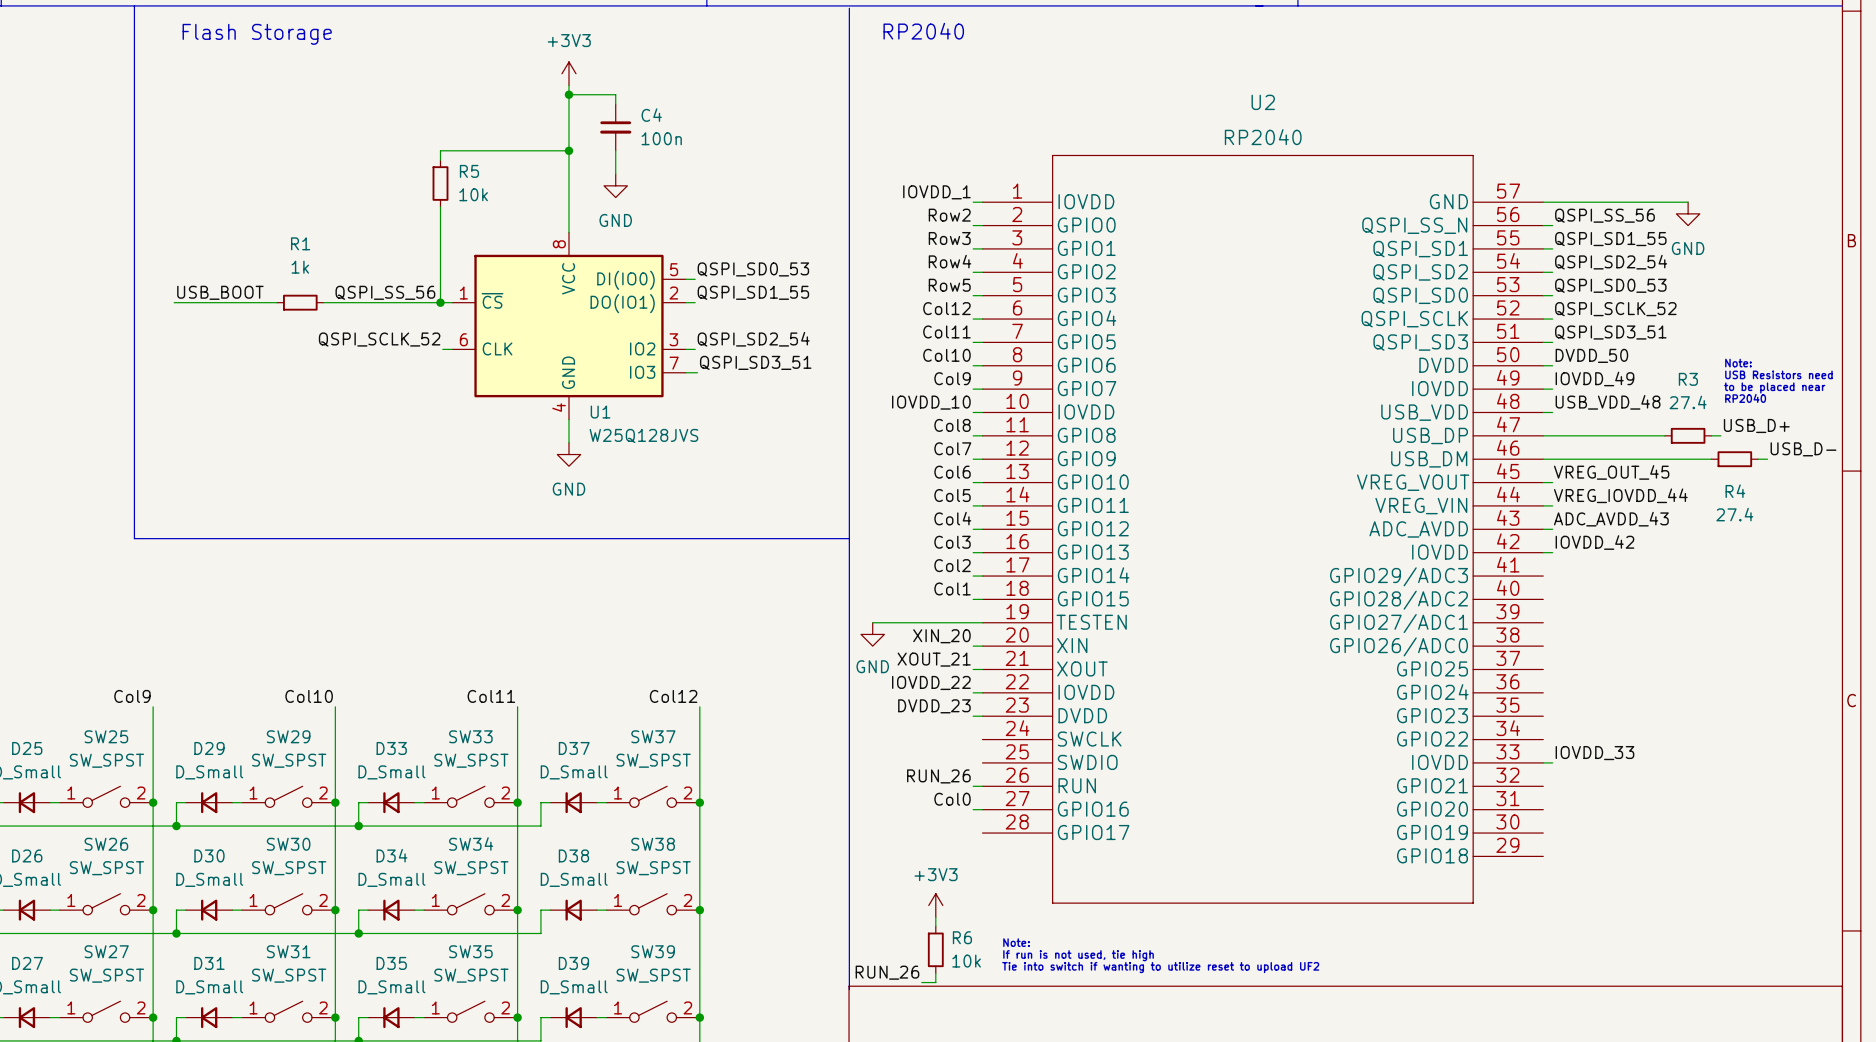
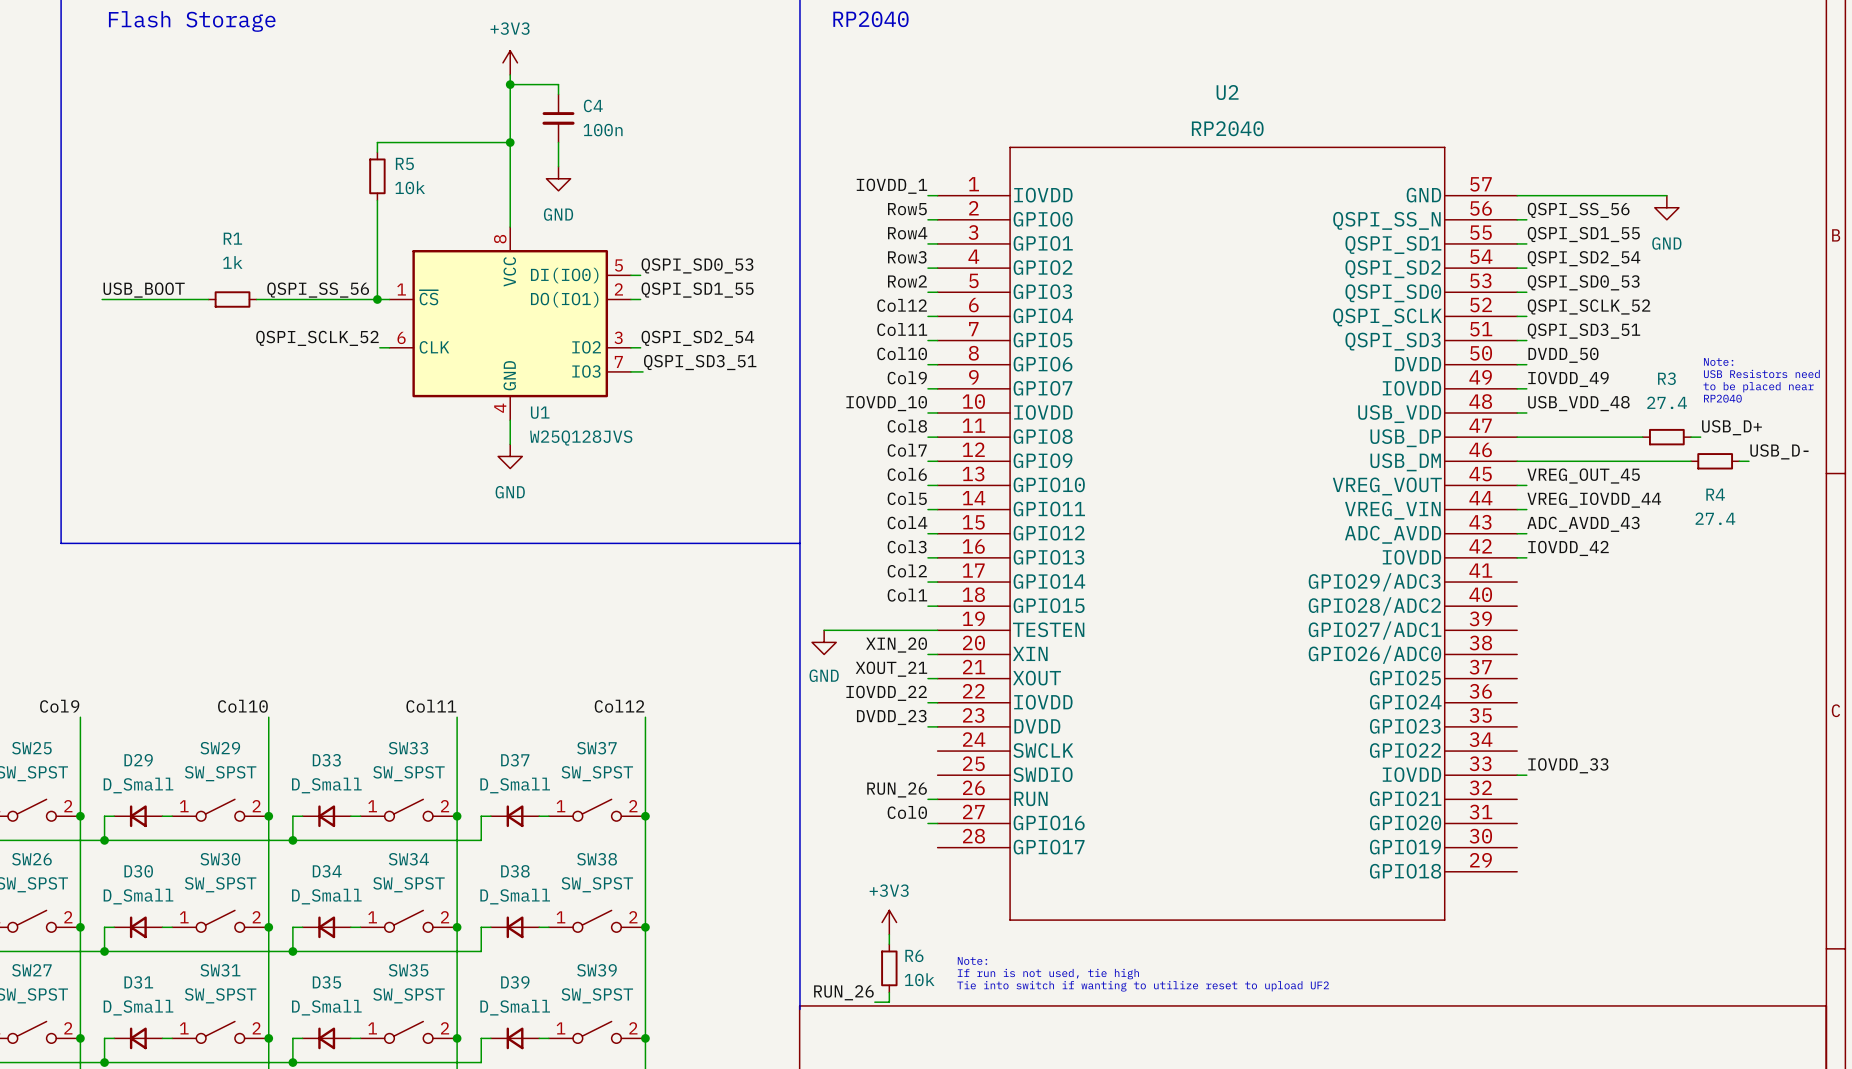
label: Row2 (949, 215) -> Row5 (907, 209)
label: Row3 (949, 238) -> Row4 (907, 233)
label: Row4 (950, 261) -> Row3 (907, 257)
label: Row5 (949, 285) -> Row2 (907, 281)

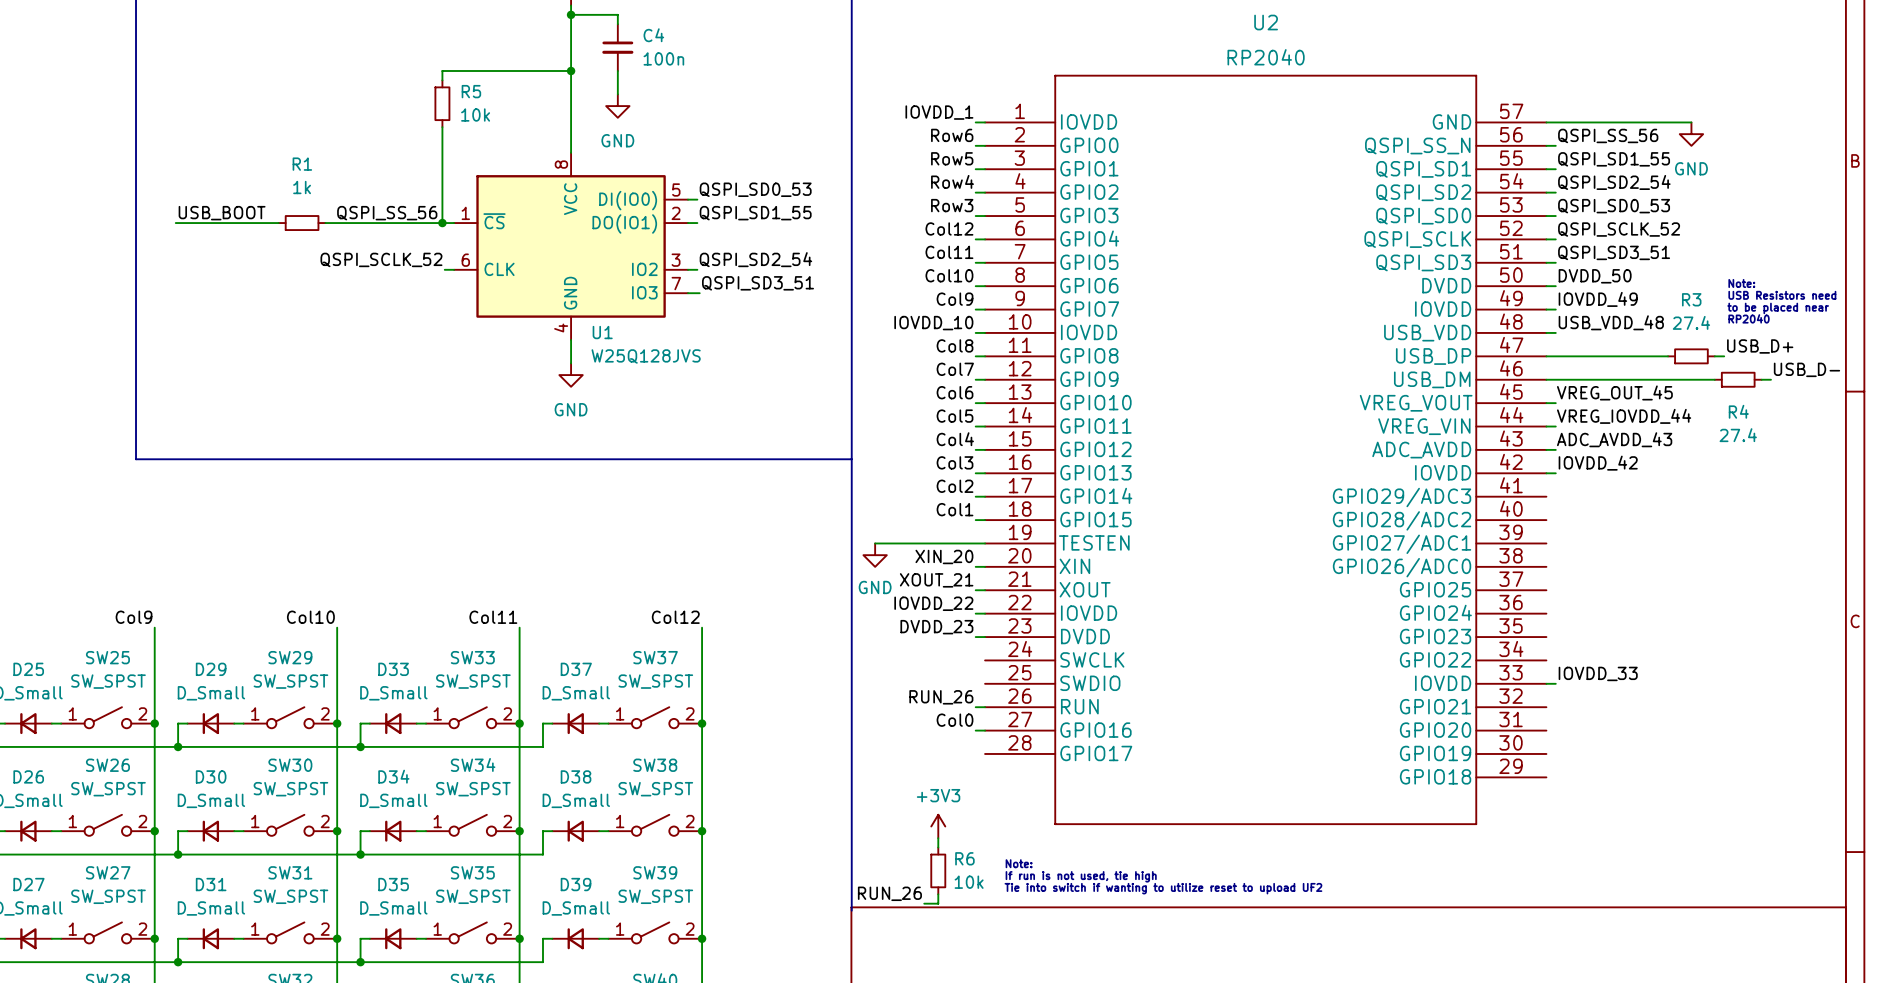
label: Row5 (907, 209) -> Row6 (952, 135)
label: Row4 (907, 233) -> Row5 (952, 158)
label: Row3 (907, 257) -> Row4 (952, 181)
label: Row2 (907, 281) -> Row3 (952, 205)

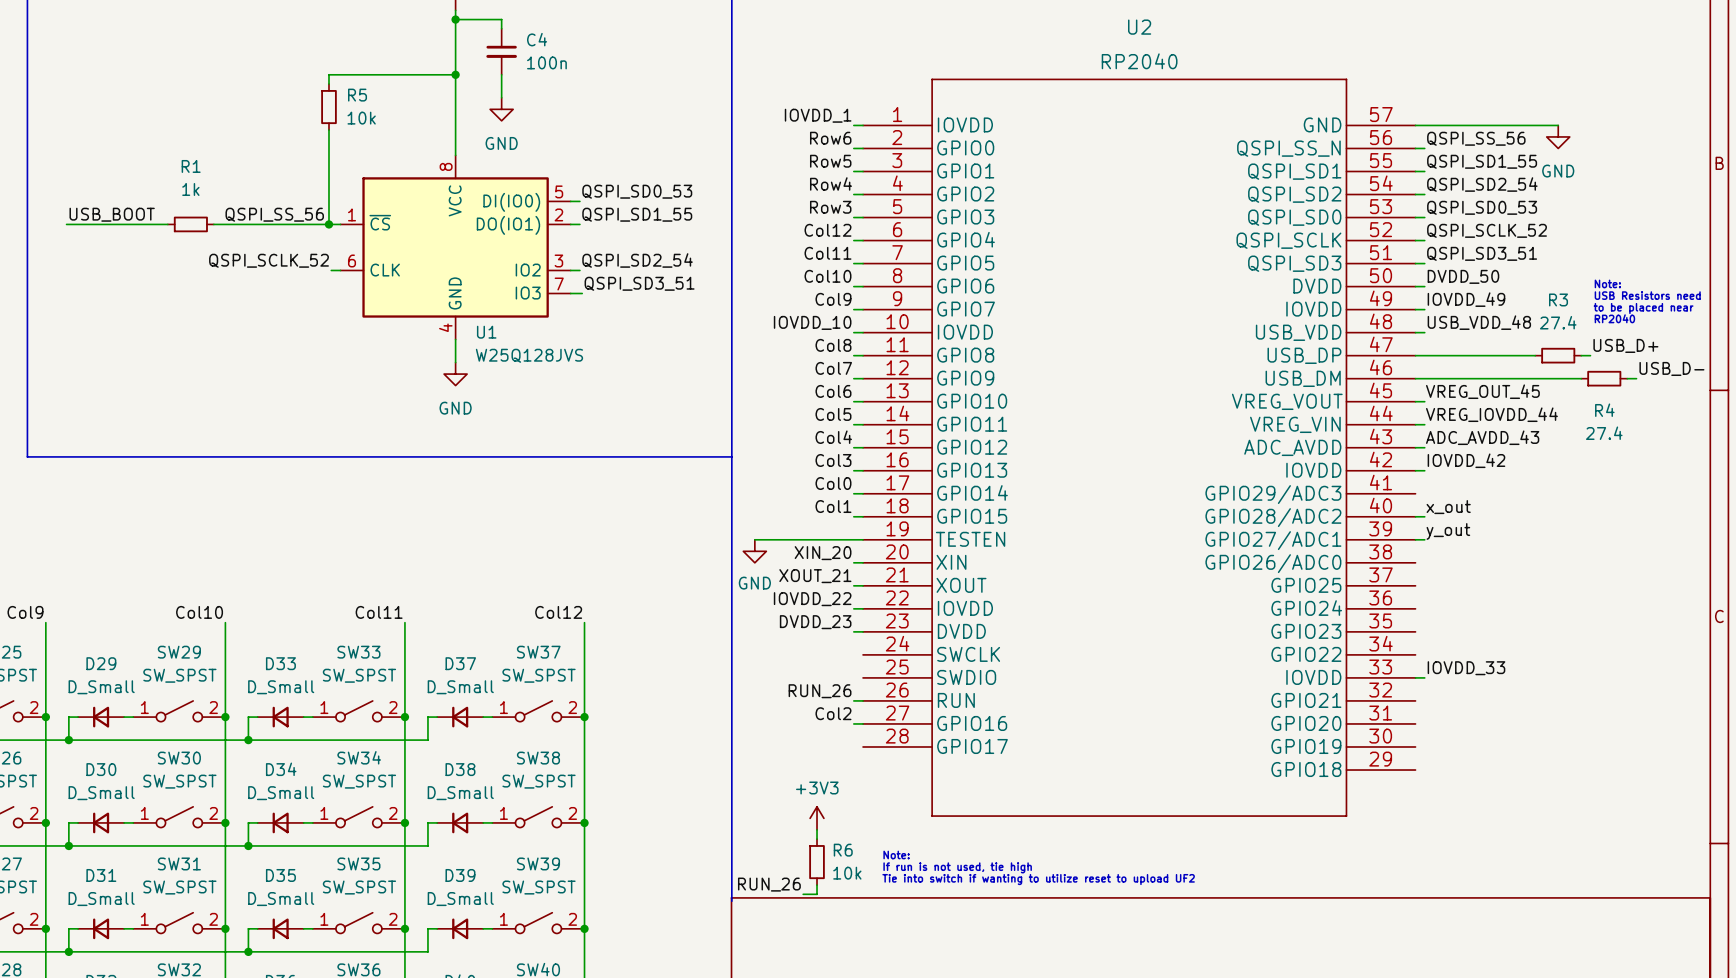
label: Col2 (955, 486) -> Col0 (833, 483)
label: none -> x_out (1448, 507)
wire: none -> (1415, 516) (1424, 516)
label: none -> y_out (1448, 531)
wire: none -> (1415, 539) (1424, 539)
label: Col0 (955, 720) -> Col2 (833, 713)

